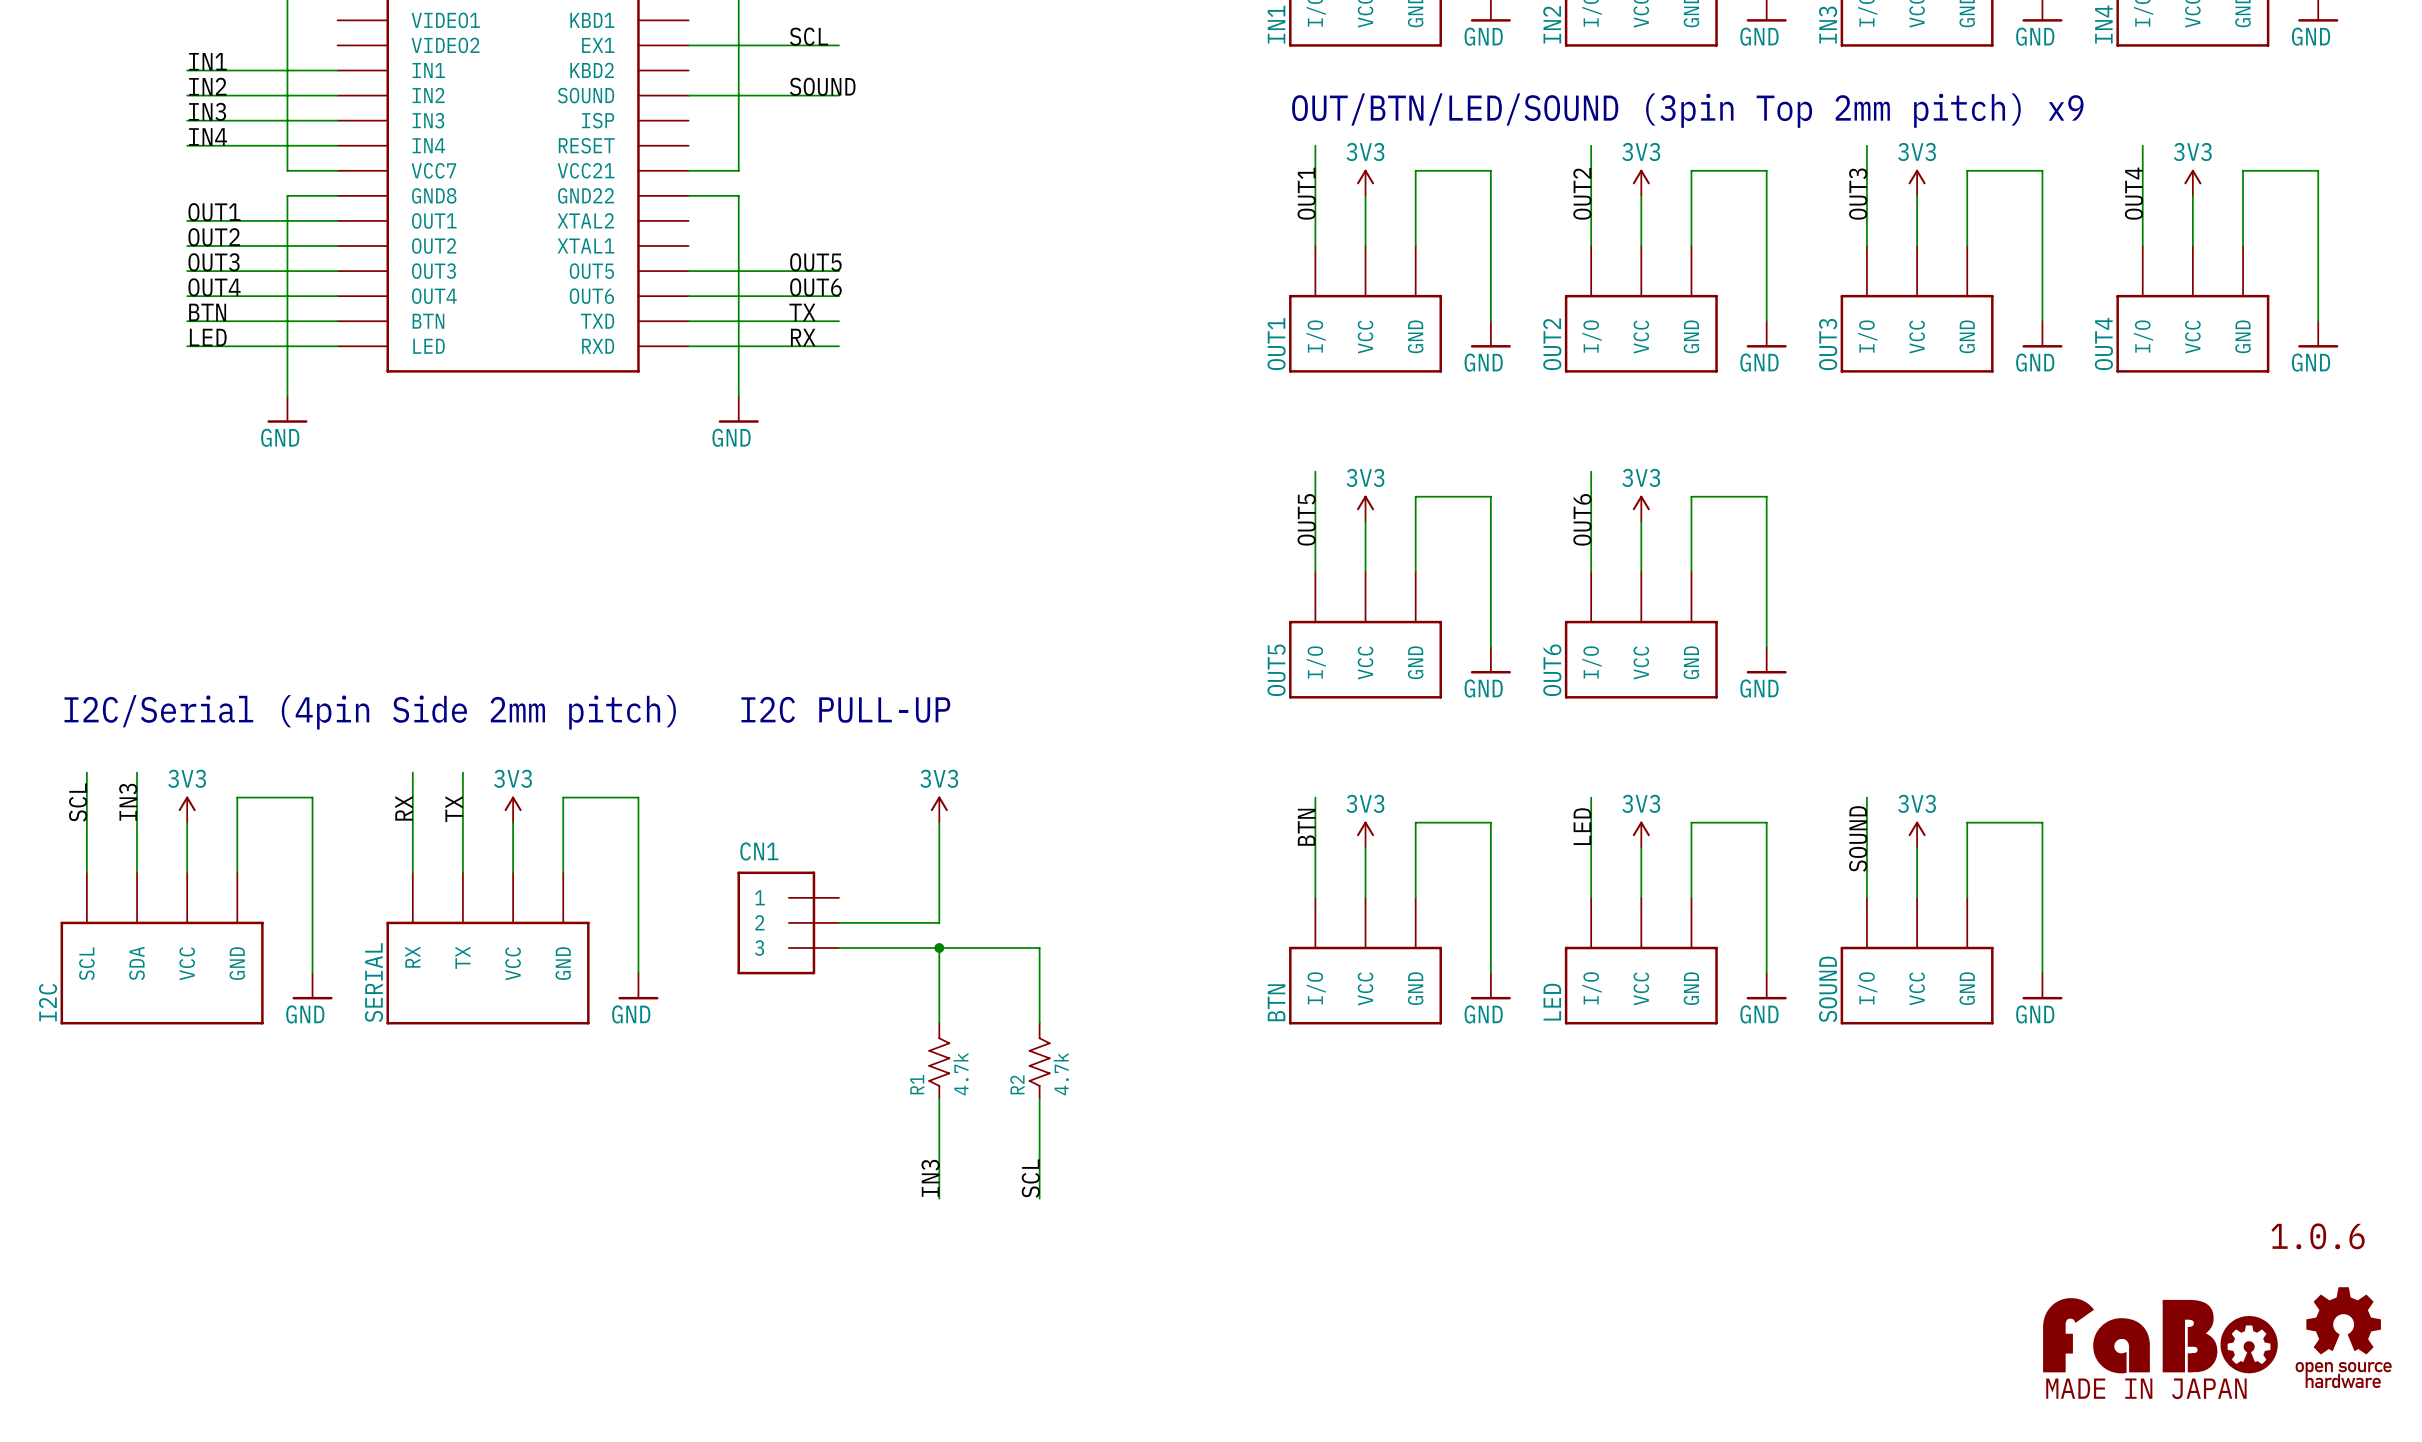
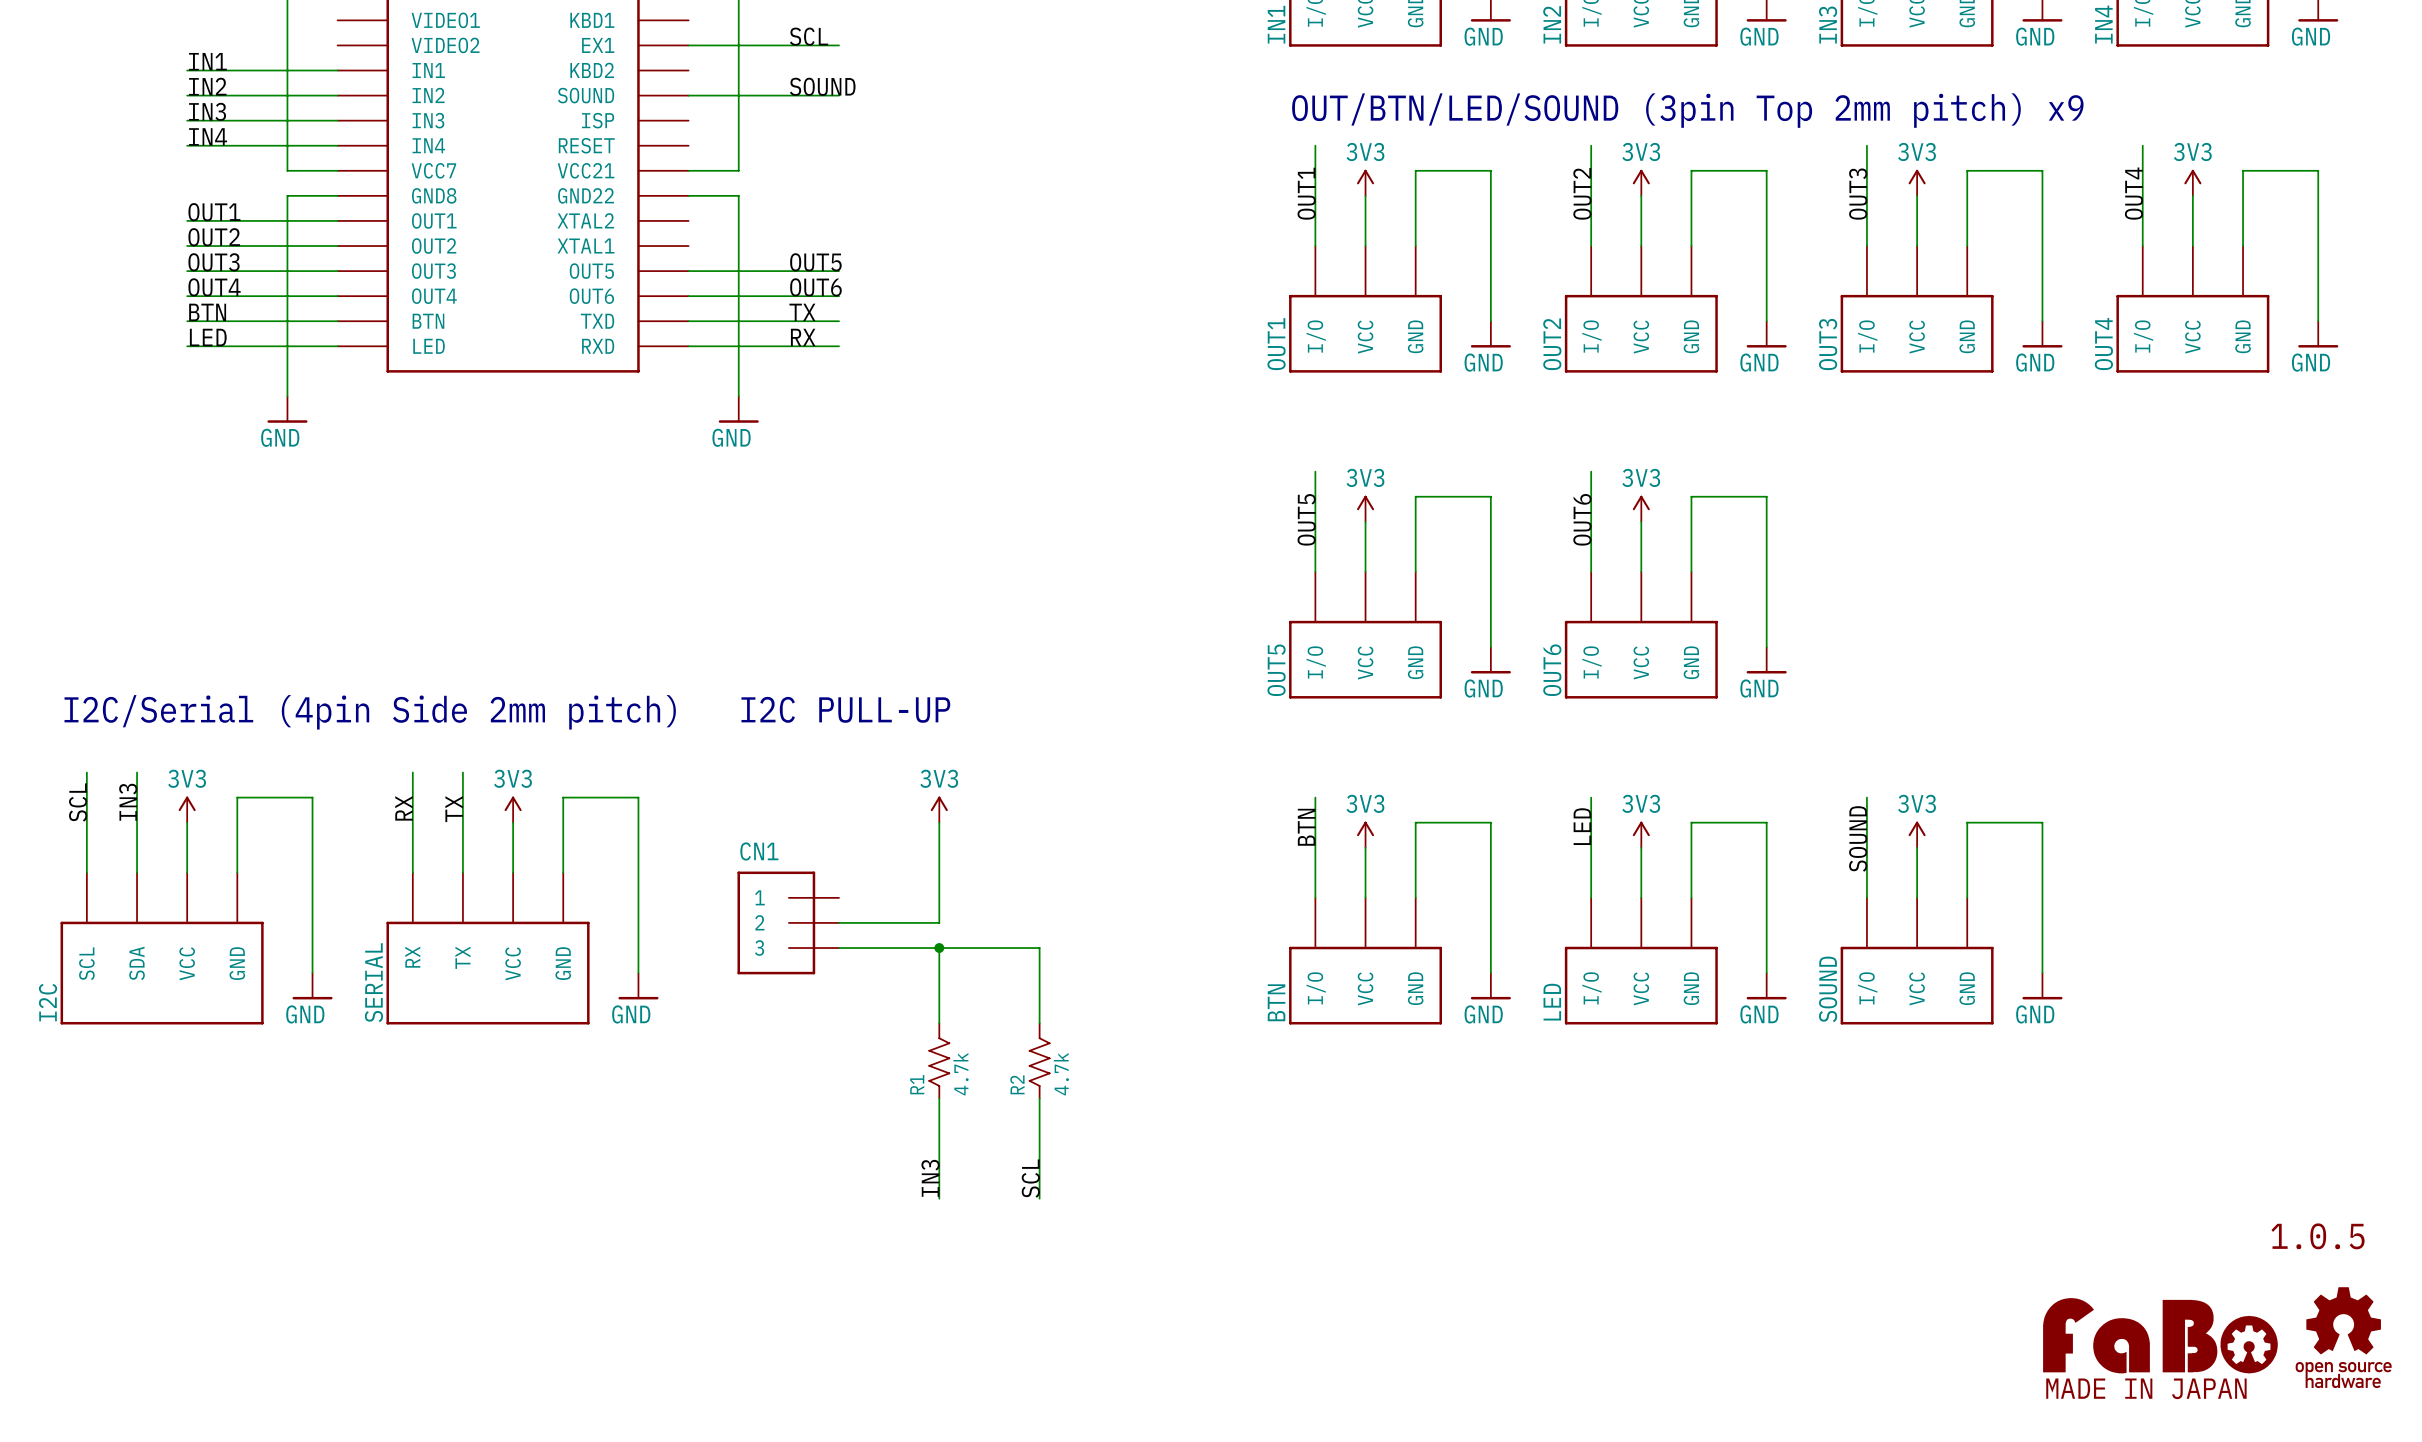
text: 1.0.6 (2318, 1236) -> 1.0.5 (2318, 1236)

